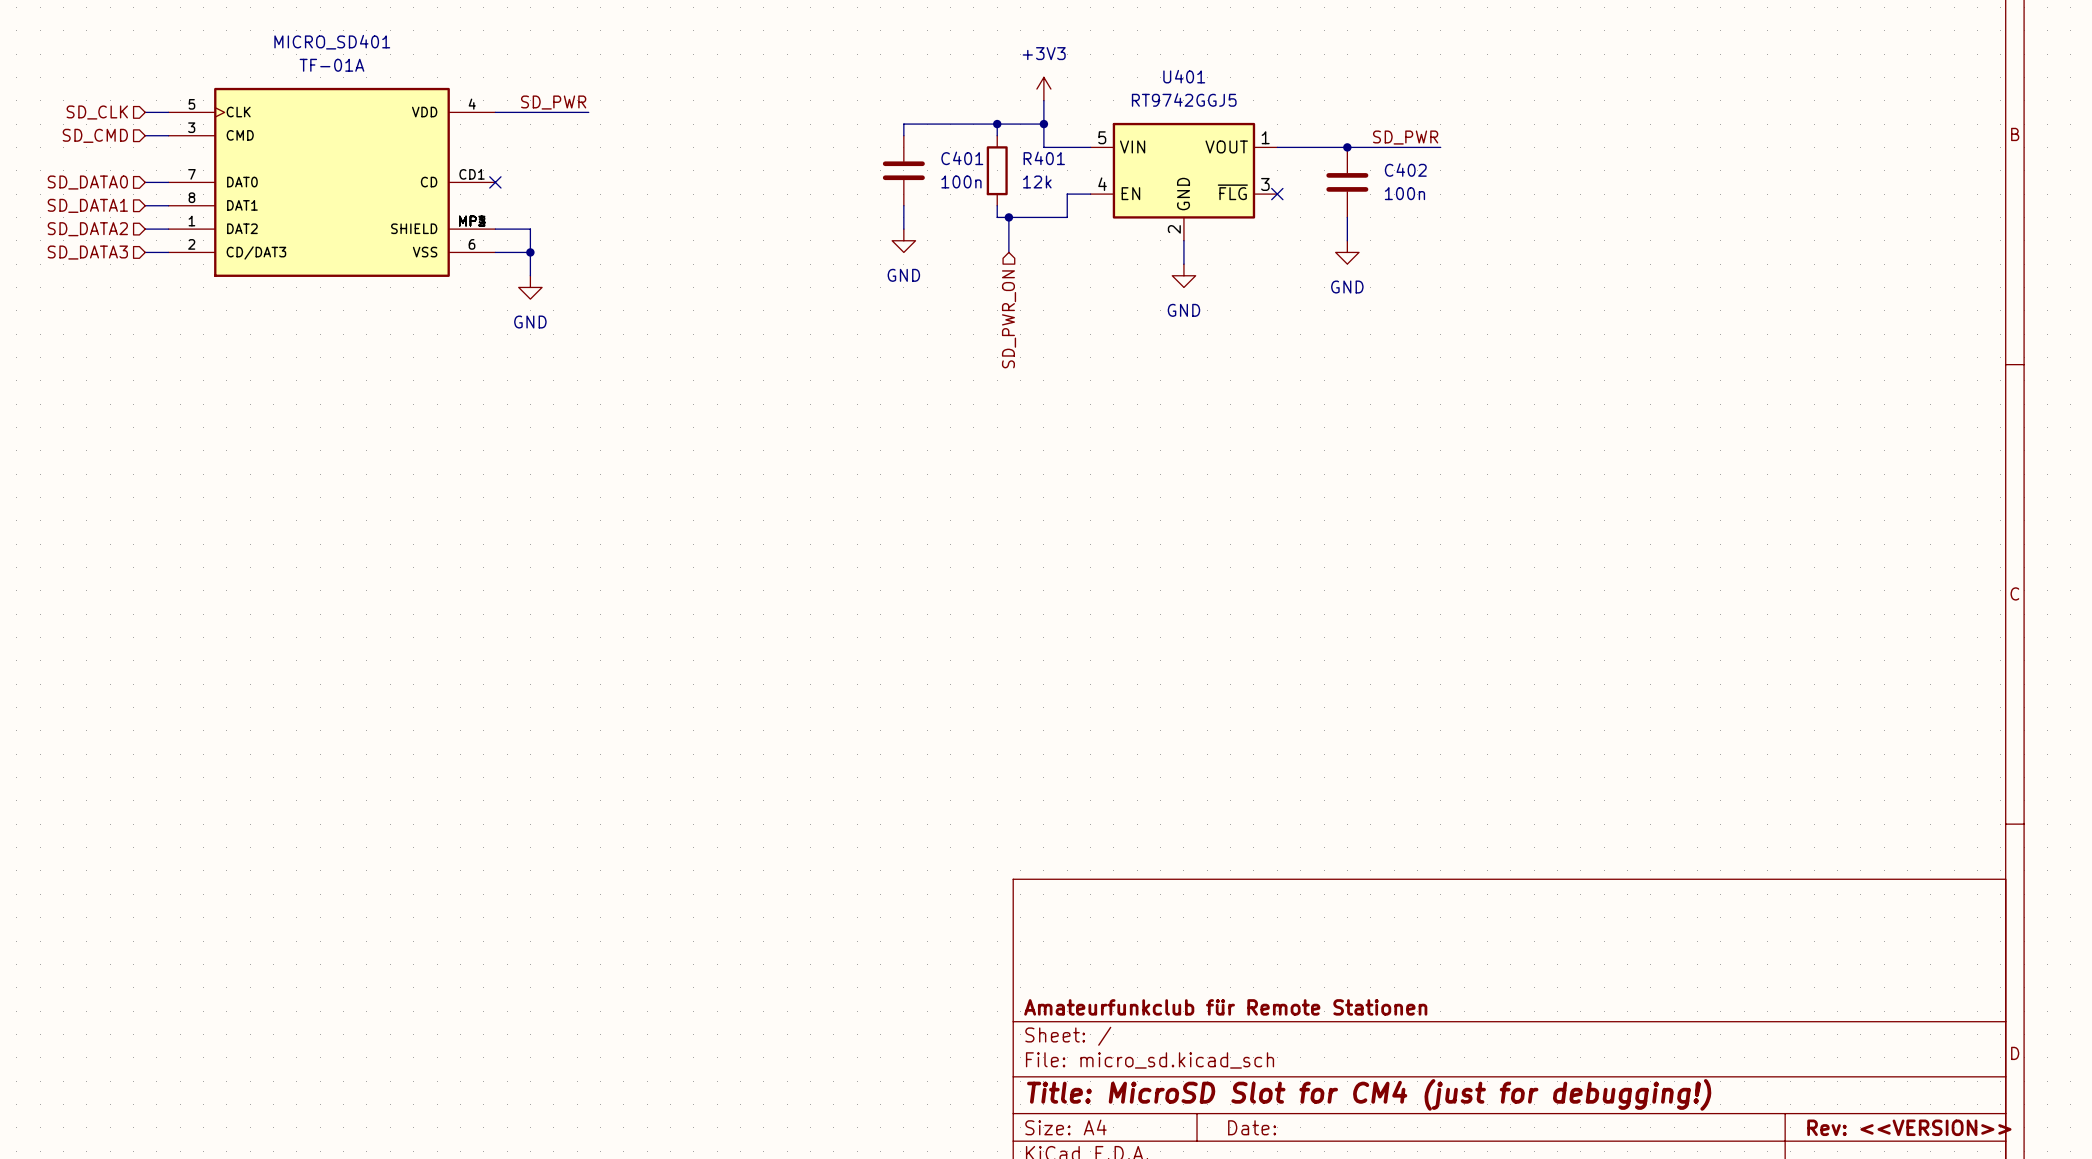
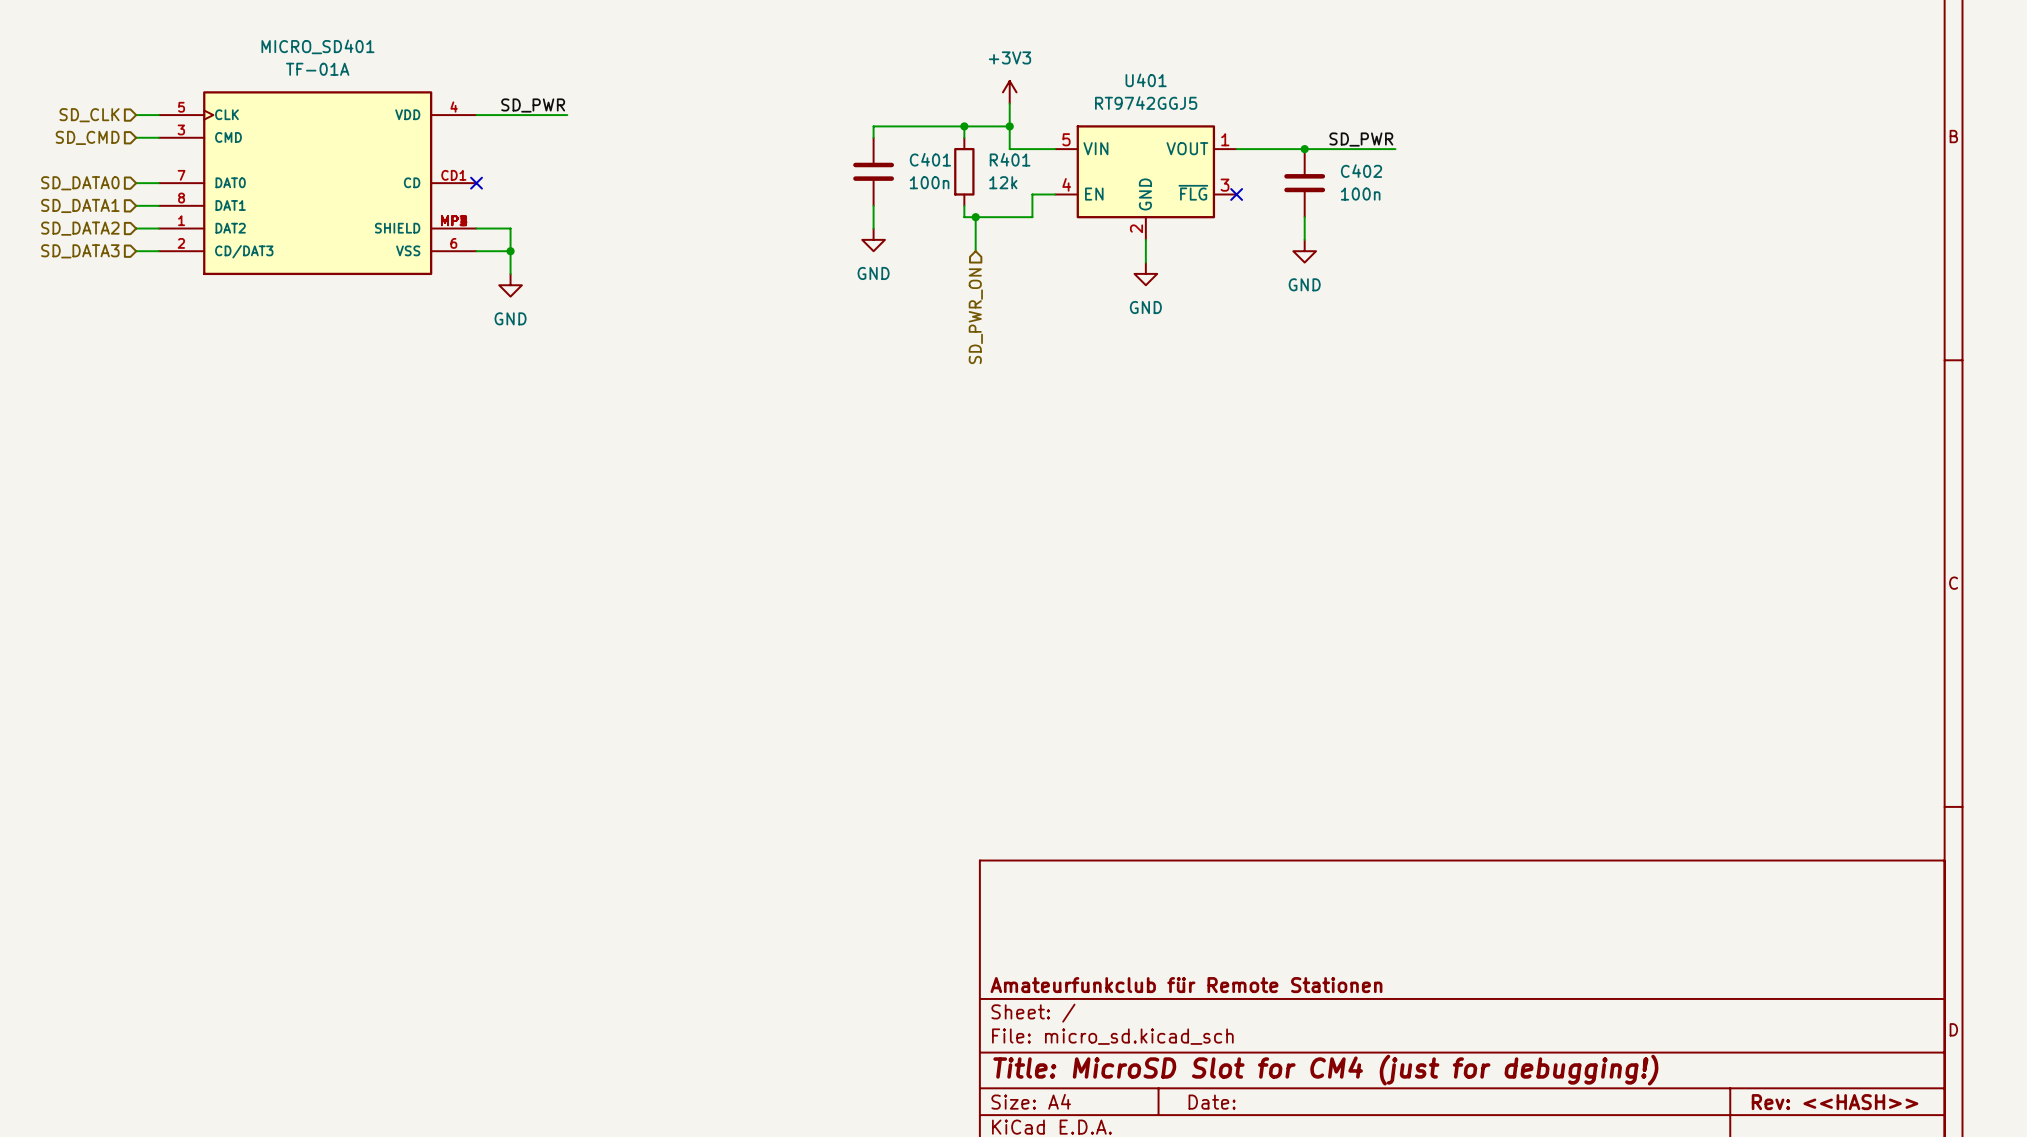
title block: Rev: <<VERSION>> (1909, 1127) -> Rev: <<HASH>> (1835, 1102)

